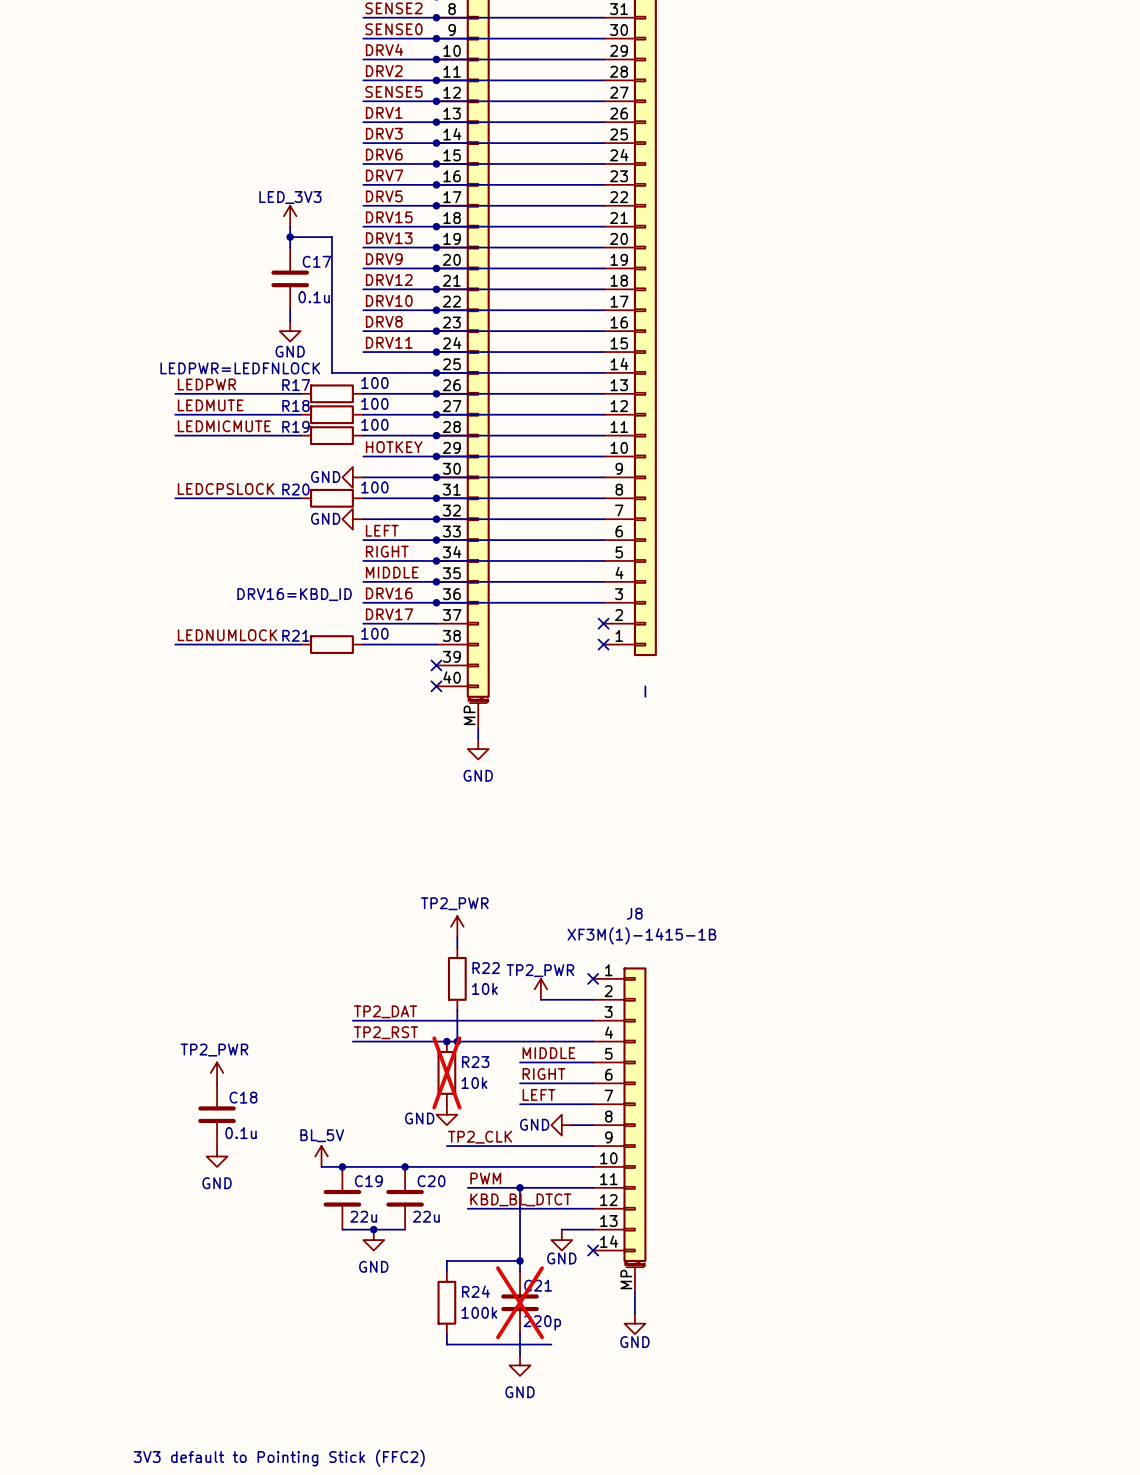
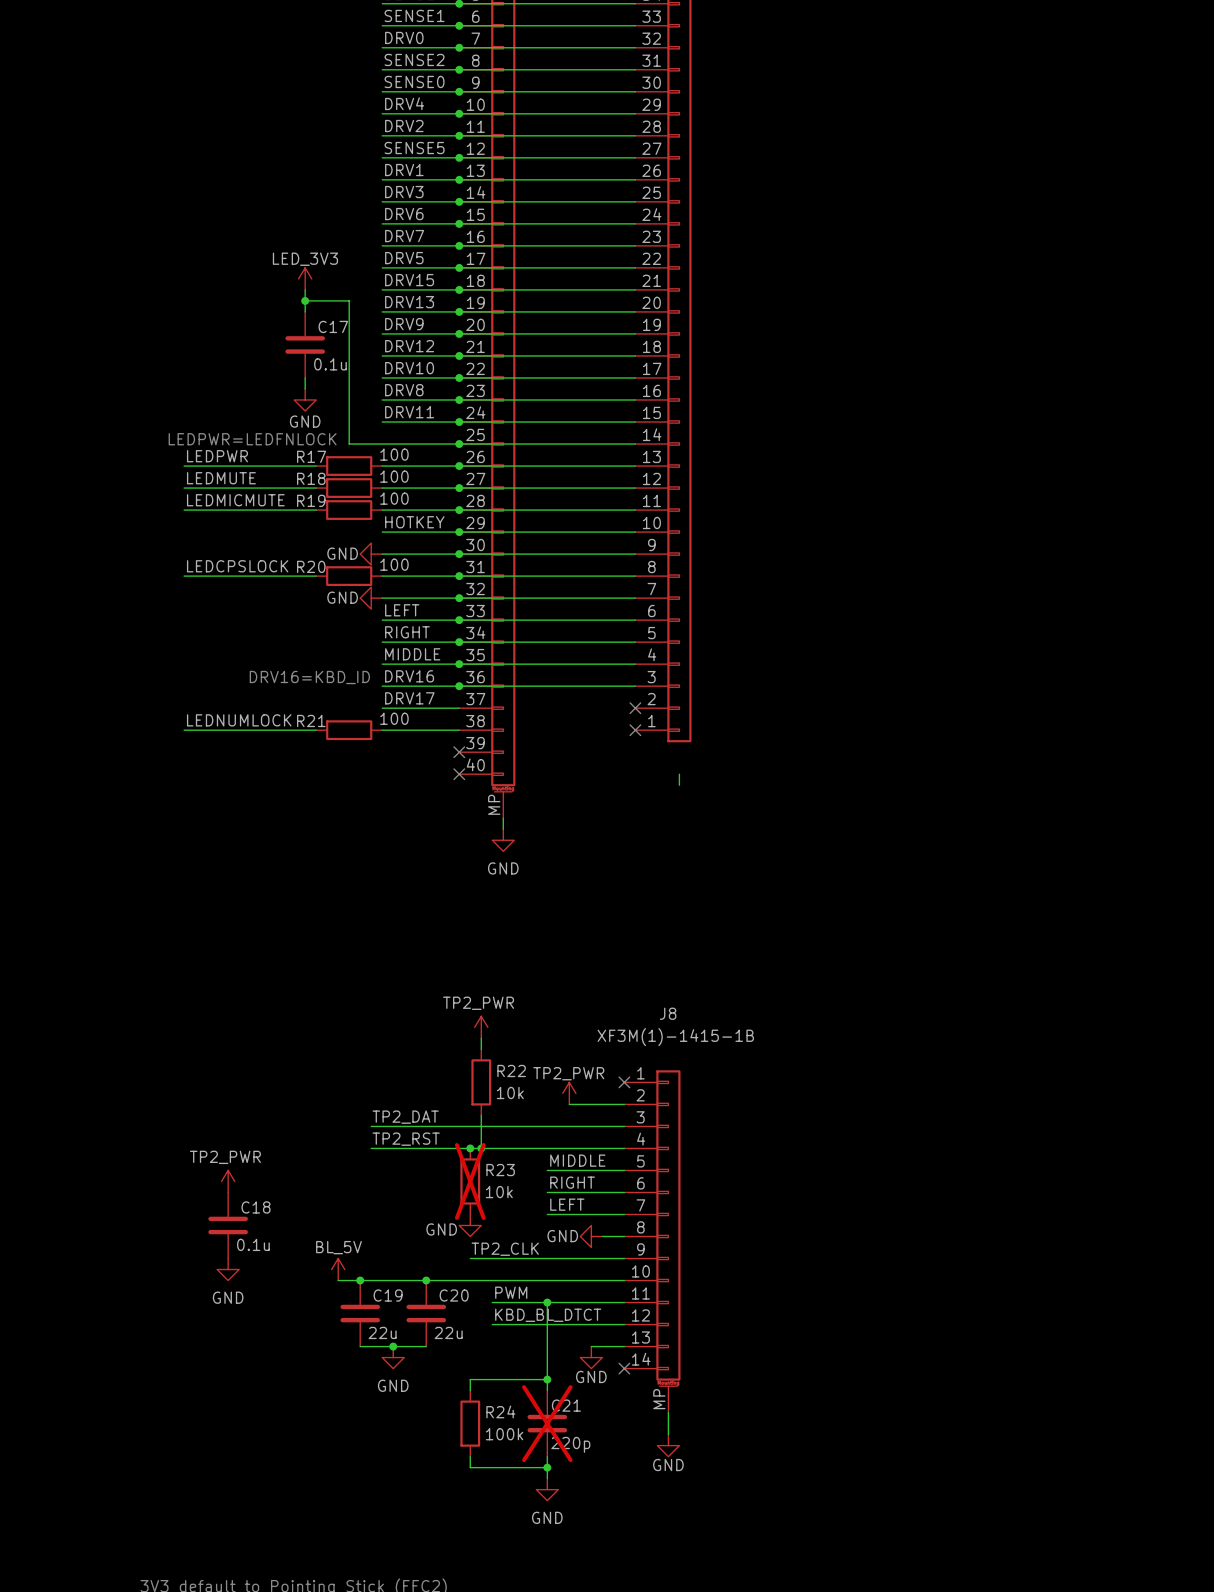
wire: (520, 1344) (551, 1344) -> none
junction: none -> (547, 1467)

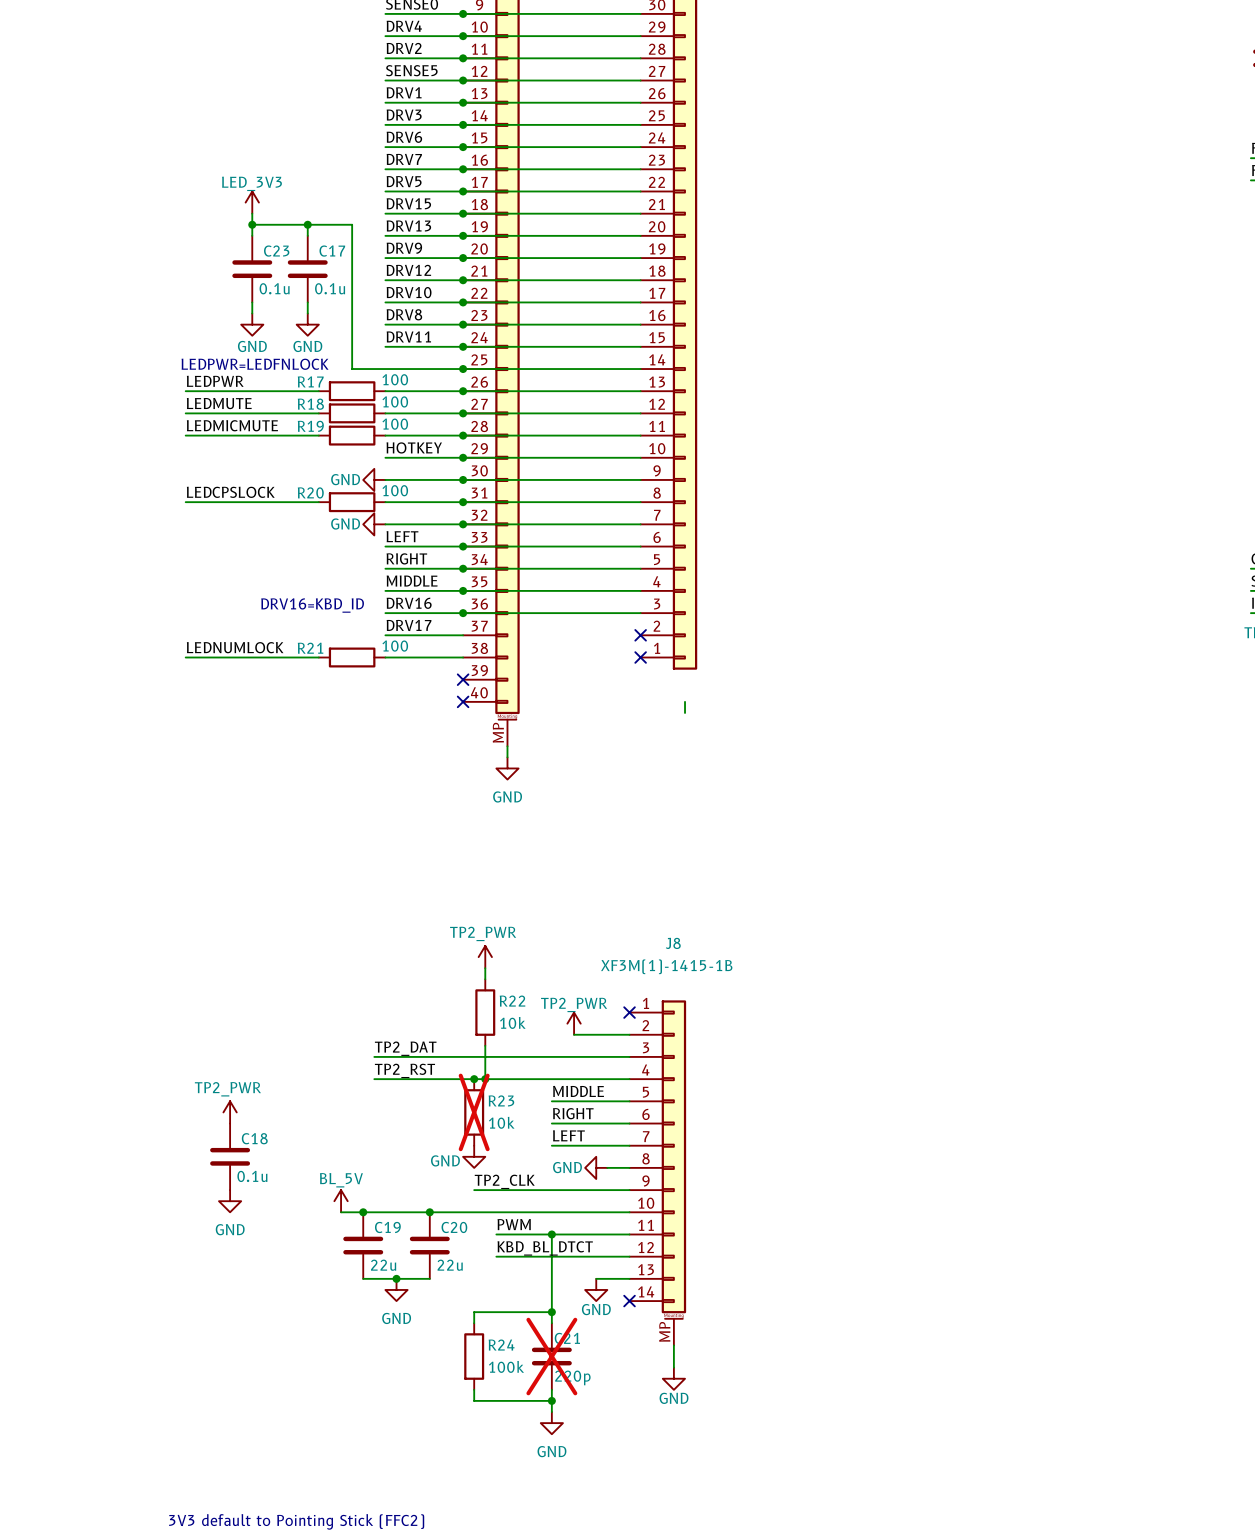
power symbol position: LED_3V3 (305, 278) -> LED_3V3 (252, 202)
wire: none -> (252, 213) (252, 235)
wire: (305, 289) (305, 300) -> (252, 224) (307, 224)
junction: none -> (252, 224)
C23: none -> 0.1u (252, 269)
wire: none -> (252, 302) (252, 313)
power symbol: none -> GND (252, 324)

